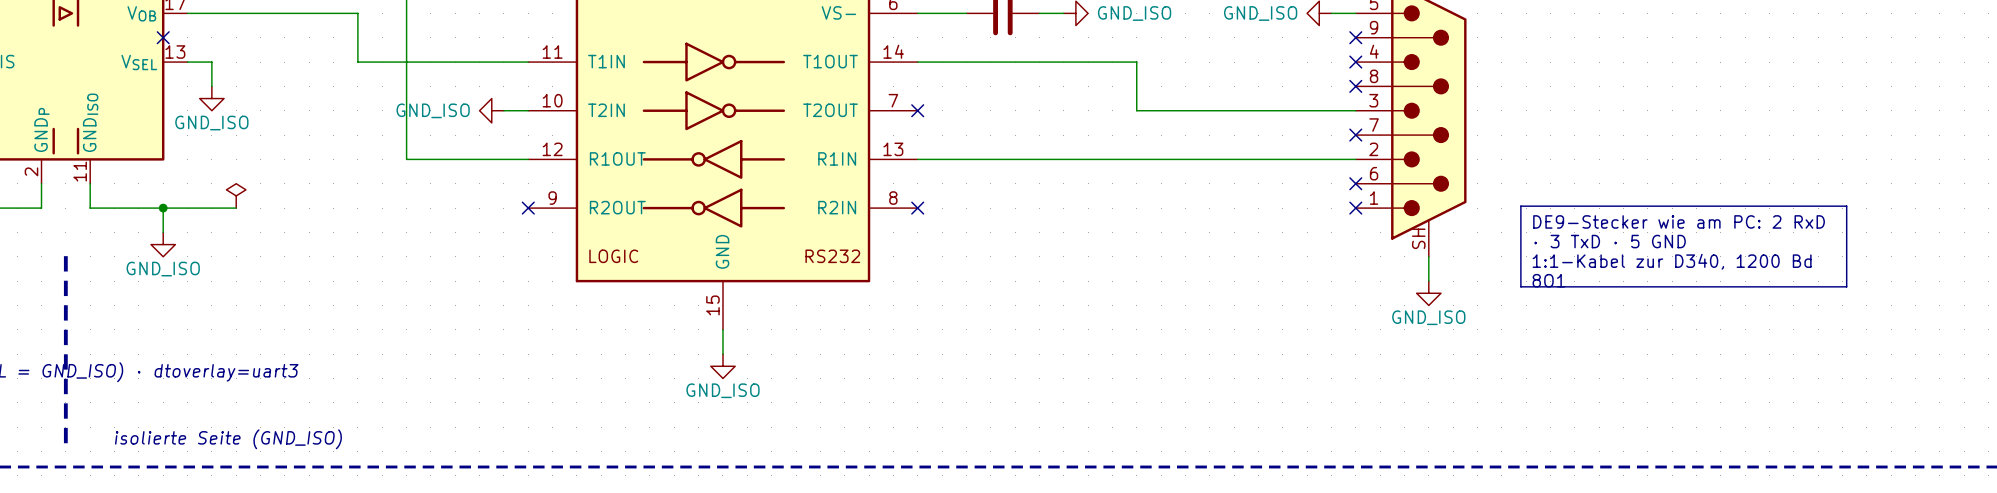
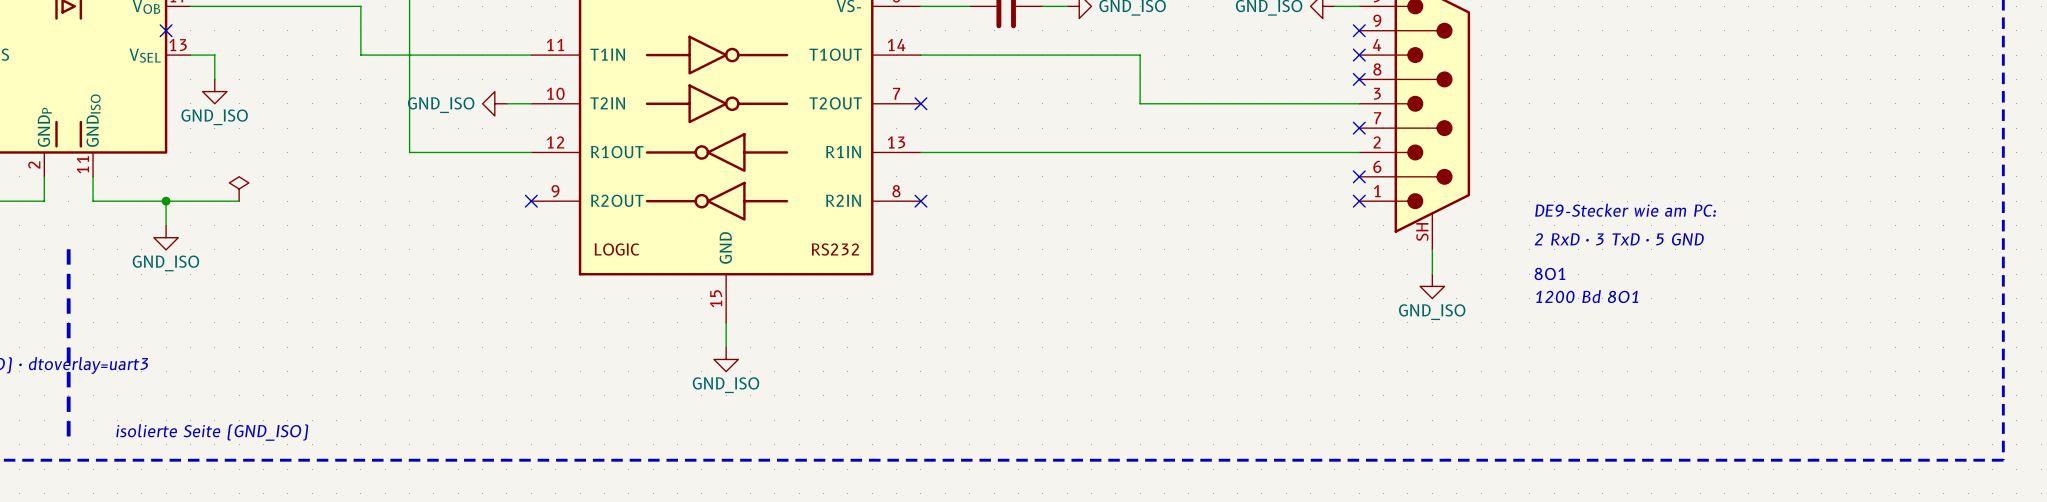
line: (1520, 206) (1846, 206) (1846, 286) (1520, 286) (1520, 206) -> none
text: DE9-Stecker wie am PC: 2 RxD (1679, 221) -> DE9-Stecker wie am PC: (1625, 210)
text: · 3 TxD · 5 GND (1610, 241) -> none
text: 1:1-Kabel zur D340, 1200 Bd (1672, 261) -> 2 RxD · 3 TxD · 5 GND (1619, 239)
text: none -> 1200 Bd 8O1 (1587, 296)

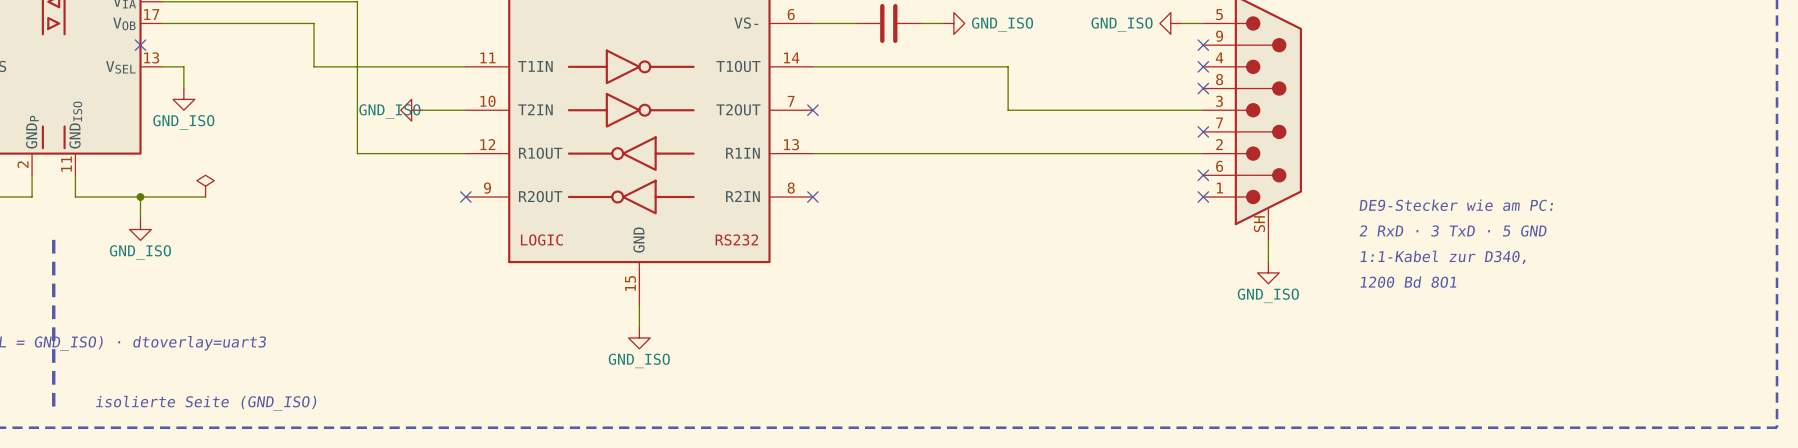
power symbol position: GND_ISO (494, 103) -> GND_ISO (411, 110)
power symbol text position: GND_ISO (441, 105) -> GND_ISO (389, 111)
text: 8O1 (1549, 273) -> 1:1-Kabel zur D340, (1443, 257)

